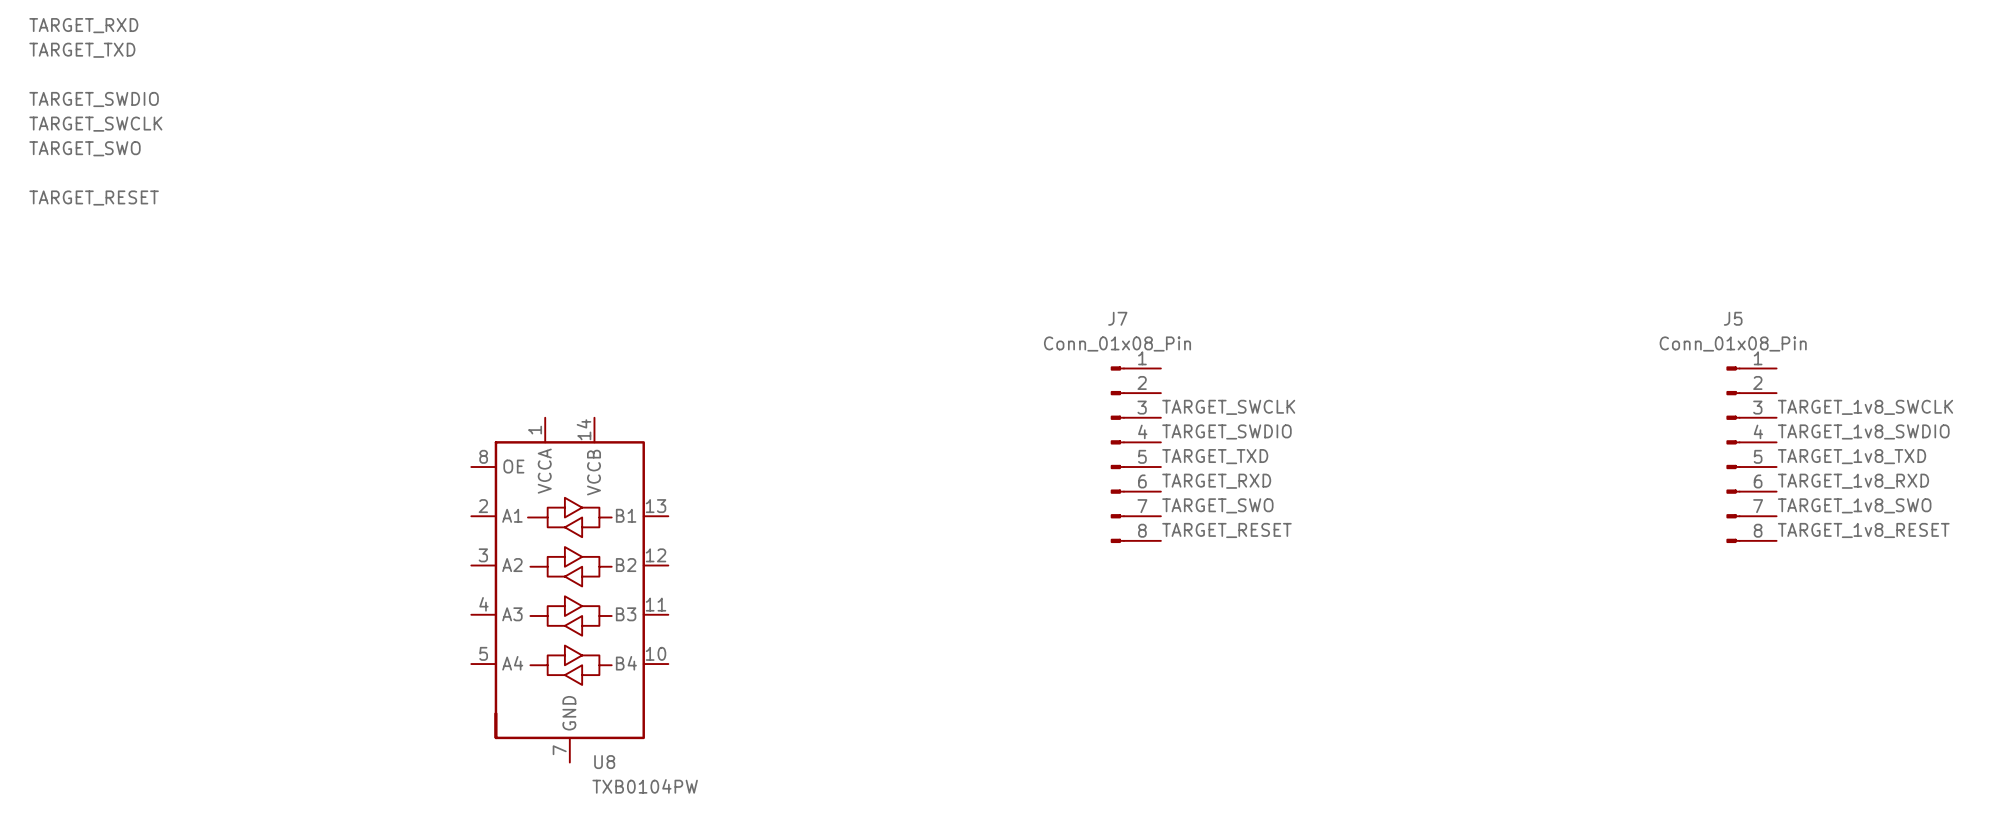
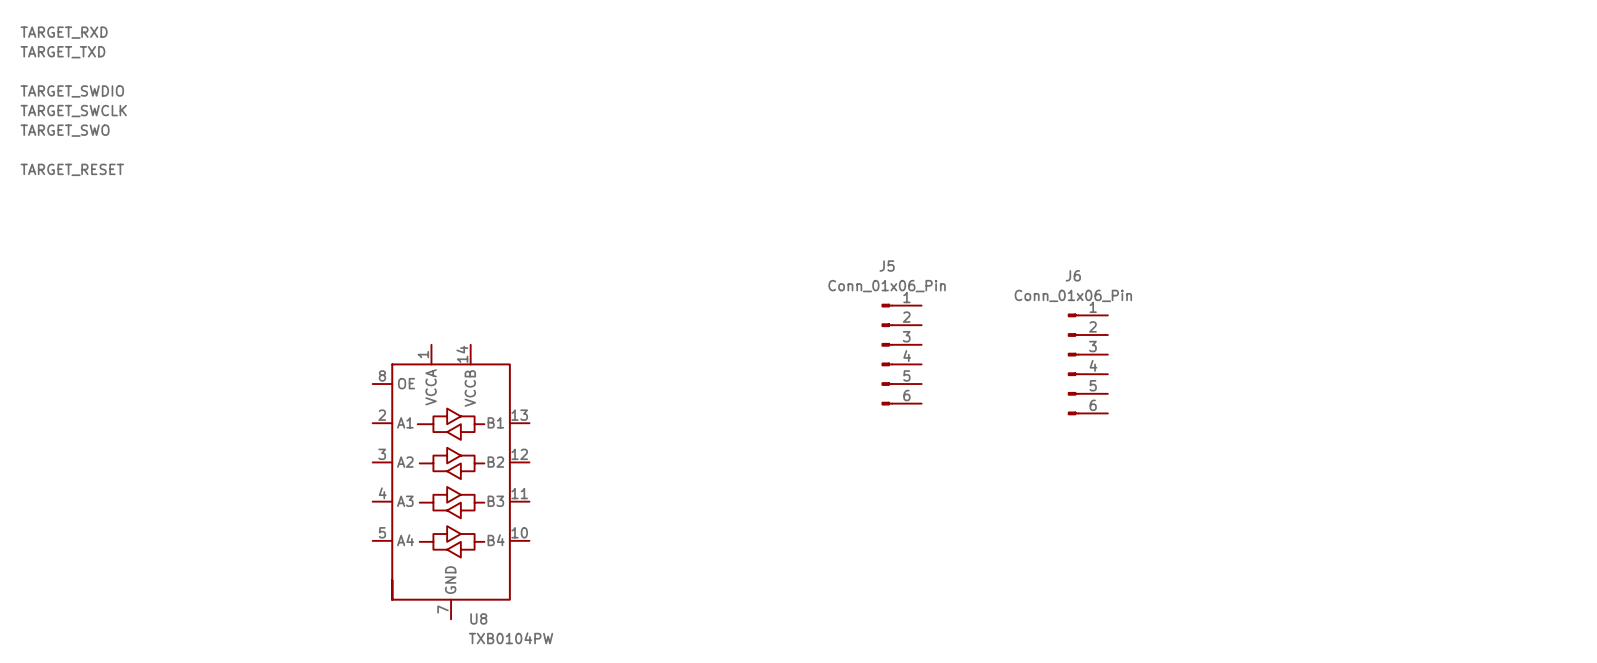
J5 name position: J5 (1733, 318) -> J5 (887, 266)
J5 value: Conn_01x08_Pin (1733, 343) -> Conn_01x06_Pin (887, 286)
J5 symbol: [1726, 366, 1777, 543] -> [881, 304, 922, 406]
label: TARGET_SWCLK (1228, 407) -> none
label: TARGET_1v8_SWCLK (1865, 407) -> none
label: TARGET_SWDIO (1226, 431) -> none
label: TARGET_1v8_SWDIO (1863, 431) -> none
J6: none -> Conn_01x06_Pin (1087, 364)
J7: Conn_01x08_Pin (1135, 454) -> none
label: TARGET_TXD (1215, 456) -> none
label: TARGET_1v8_TXD (1852, 456) -> none
label: TARGET_RXD (1216, 481) -> none
label: TARGET_1v8_RXD (1853, 481) -> none
label: TARGET_SWO (1217, 505) -> none
label: TARGET_1v8_SWO (1854, 505) -> none
label: TARGET_RESET (1226, 530) -> none
label: TARGET_1v8_RESET (1863, 530) -> none

